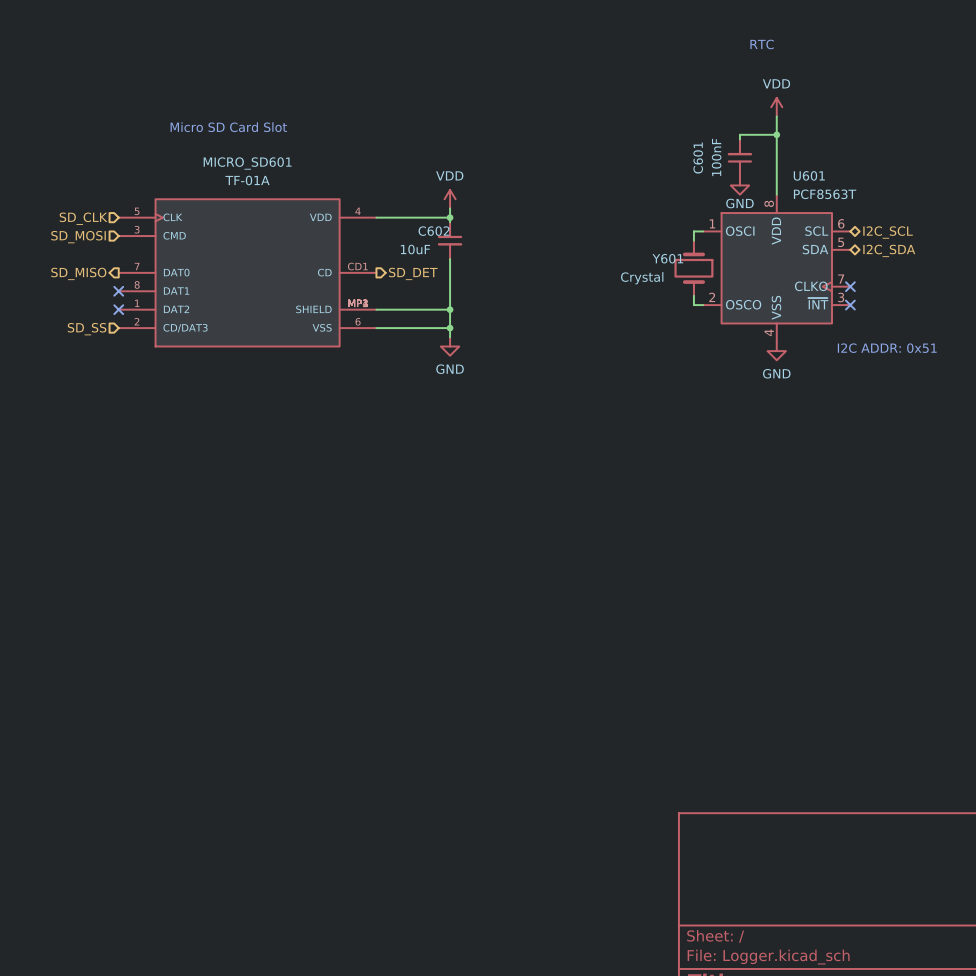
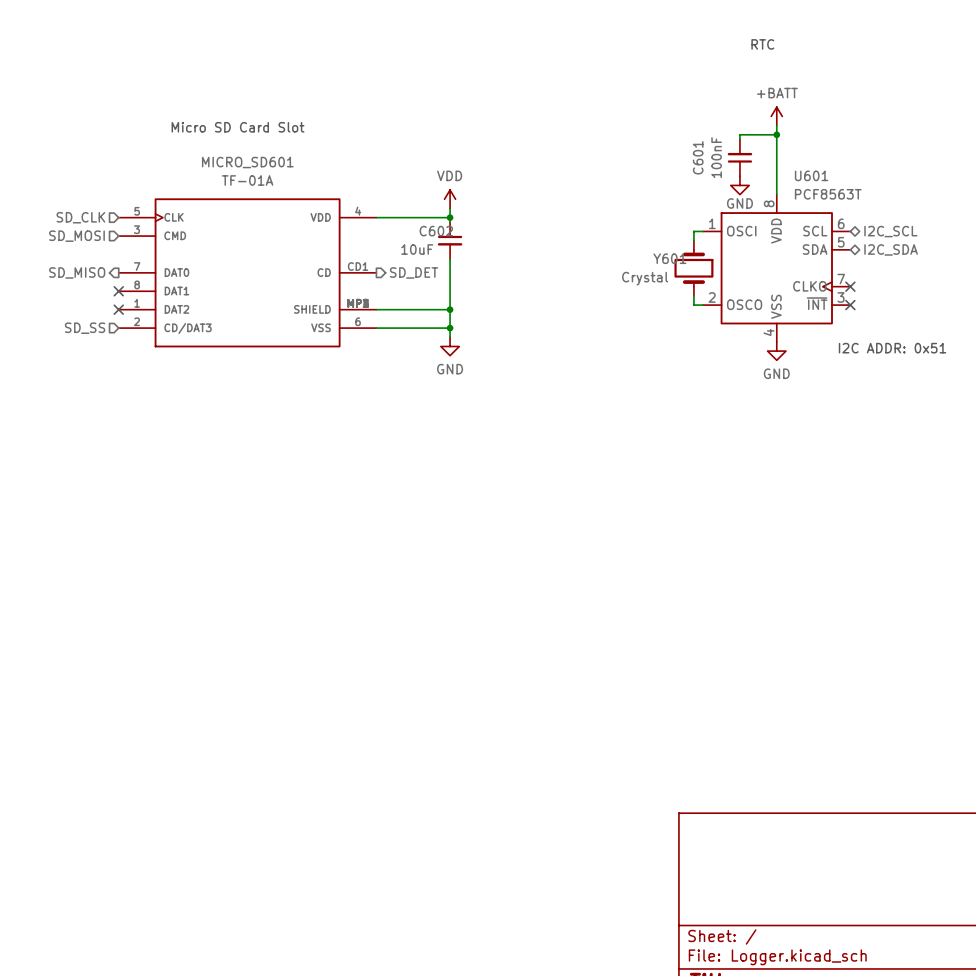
power symbol: VDD (776, 107) -> none
power symbol: none -> +BATT (776, 116)

